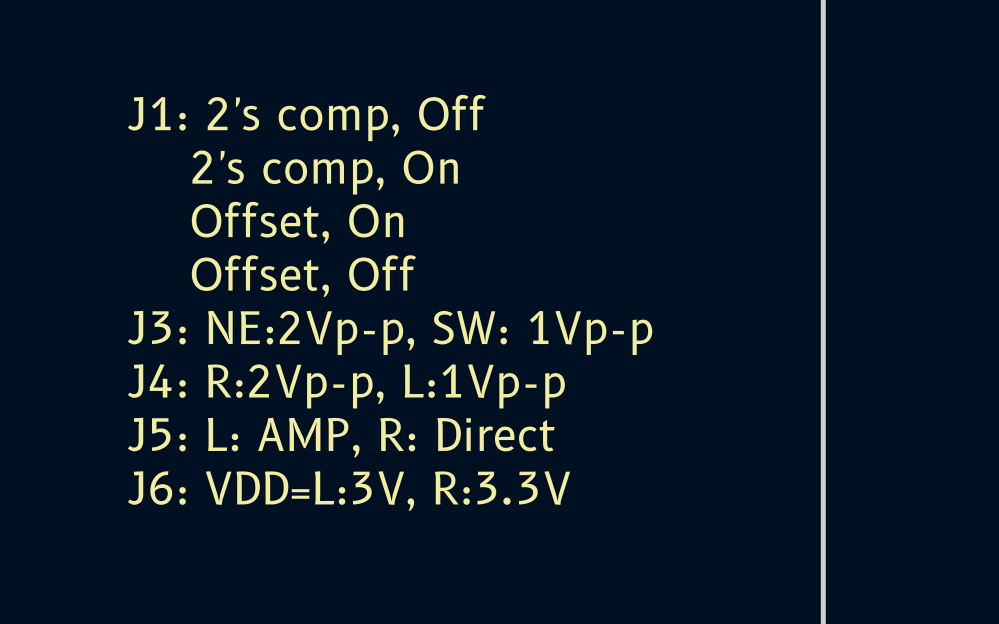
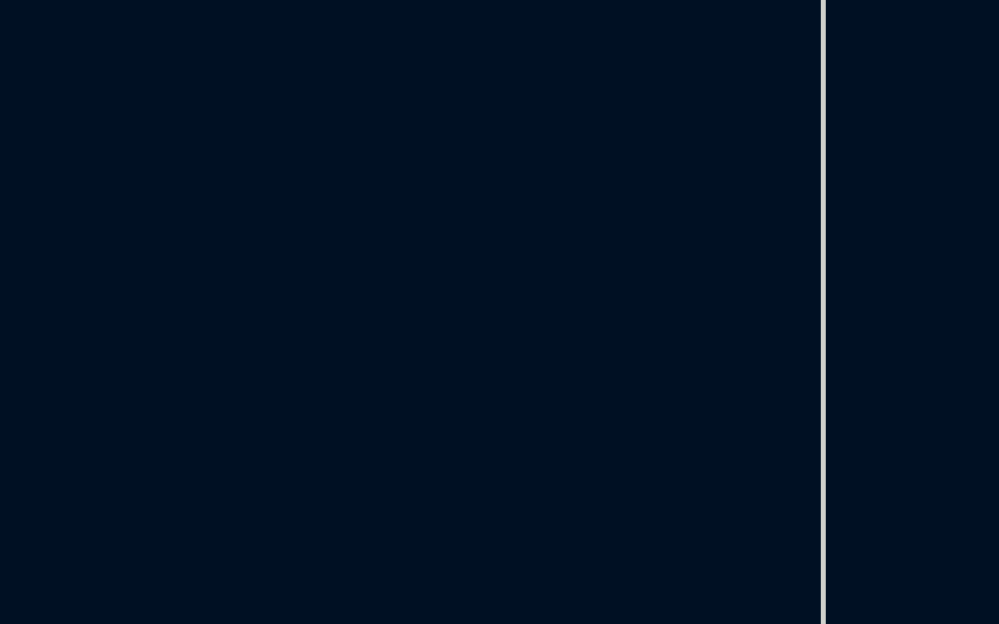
text: J1: 2's comp, Off (306, 118) -> none
text: 2's comp, On (325, 172) -> none
text: Offset, On (297, 222) -> none
text: Offset, Off (303, 276) -> none
text: J3: NE:2Vp-p, SW: 1Vp-p (390, 332) -> none
text: J4: R:2Vp-p, L:1Vp-p (346, 386) -> none
text: J5: L: AMP, R: Direct (341, 437) -> none
text: J6: VDD=L:3V, R:3.3V (349, 491) -> none

